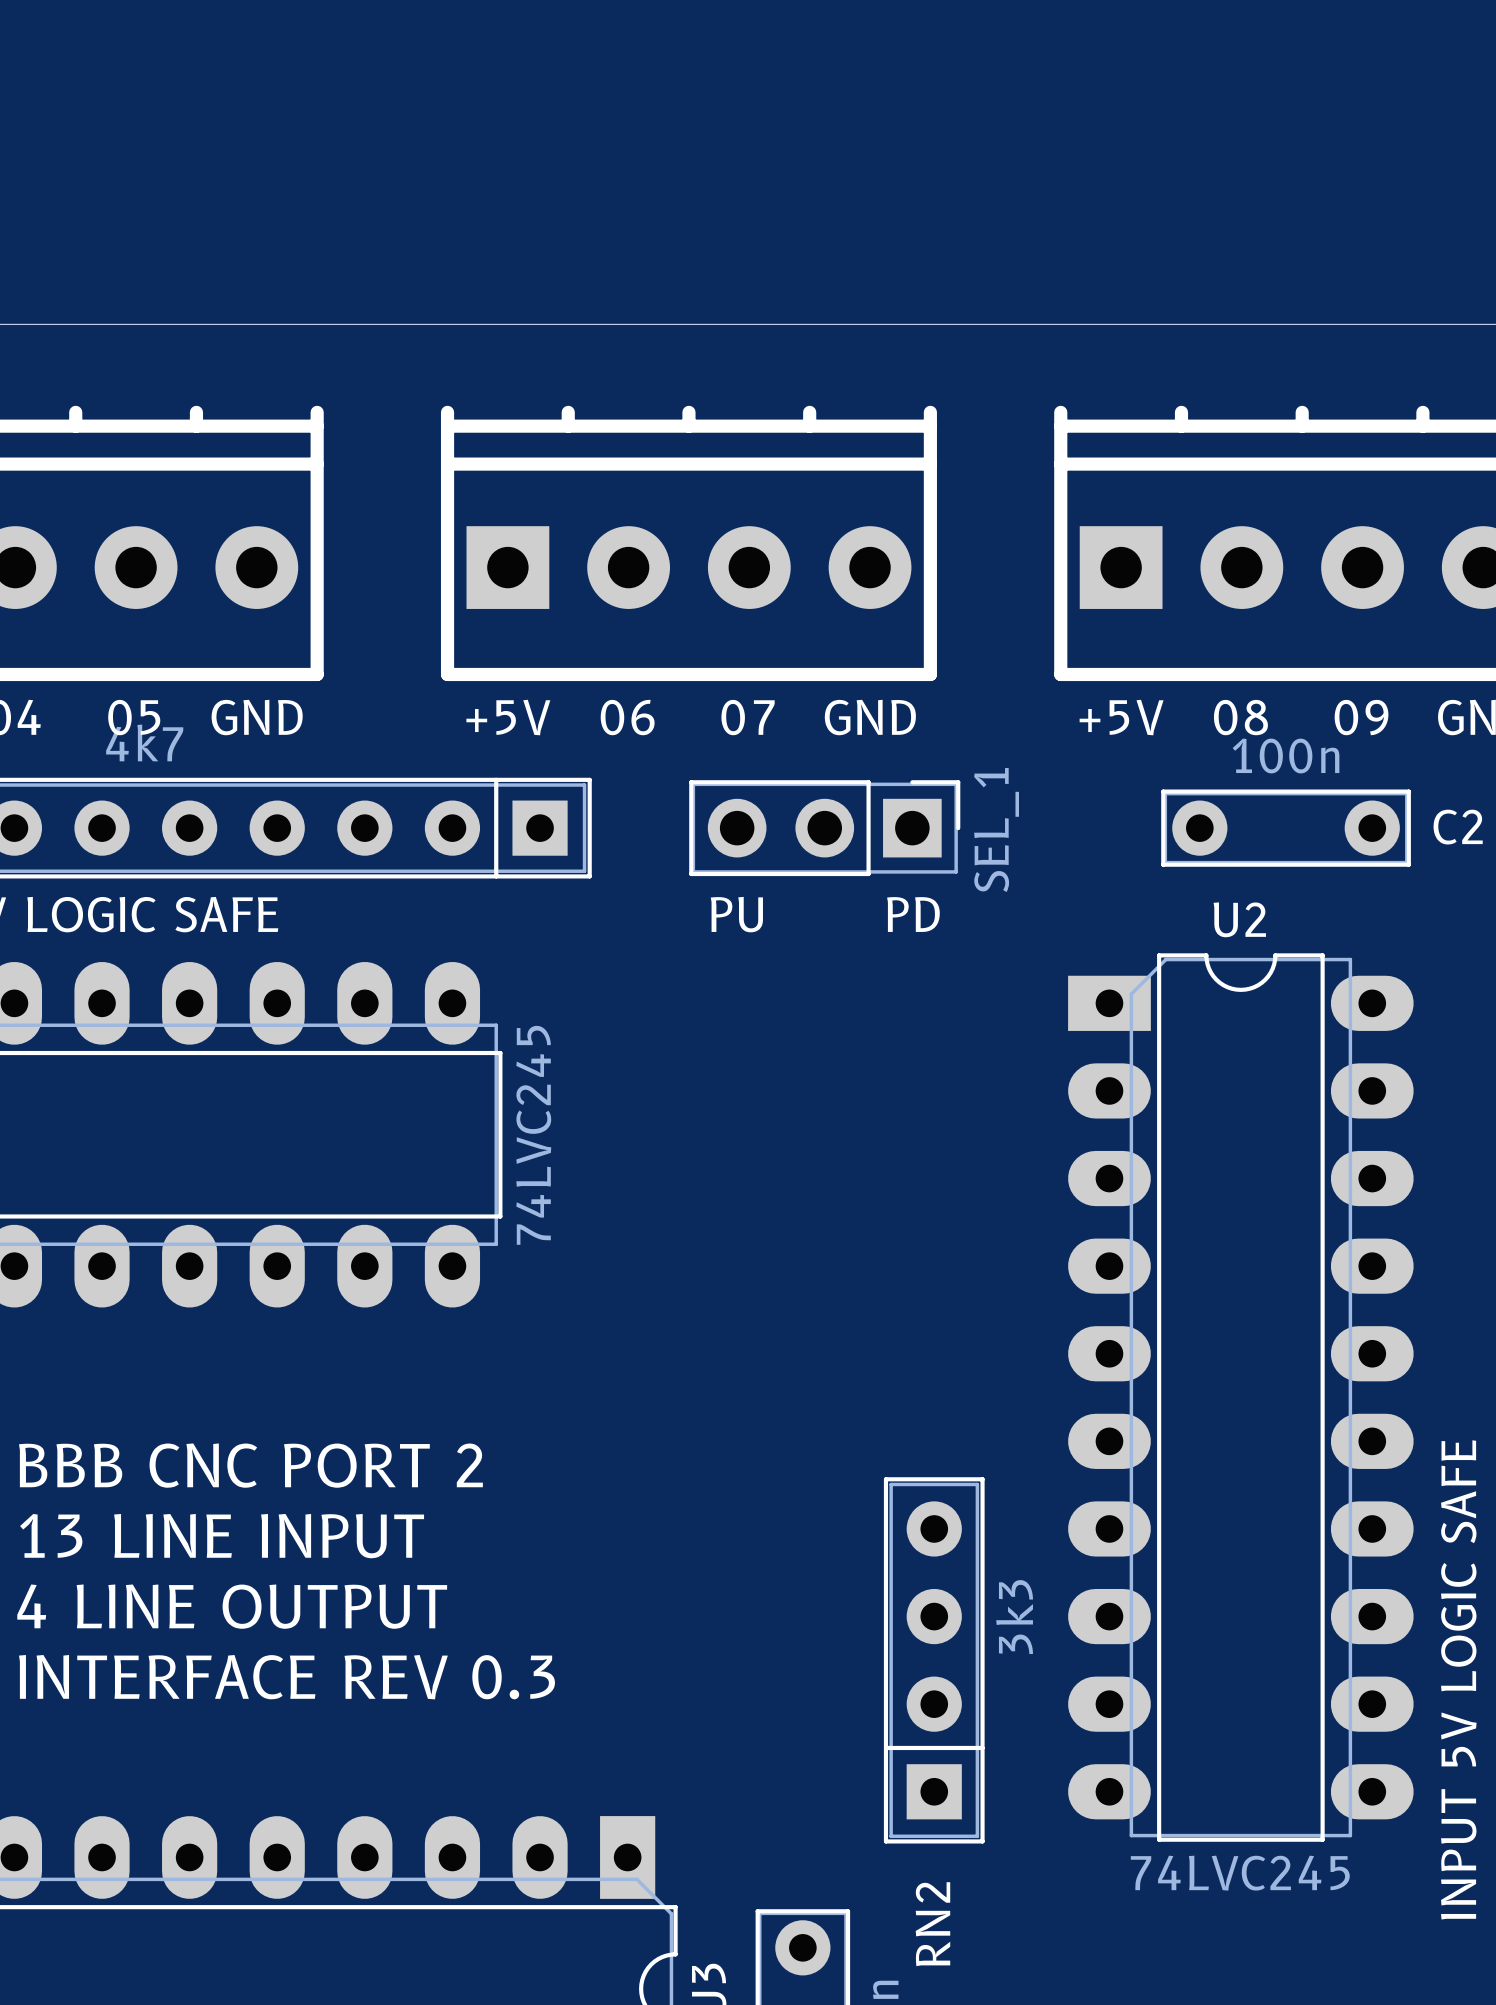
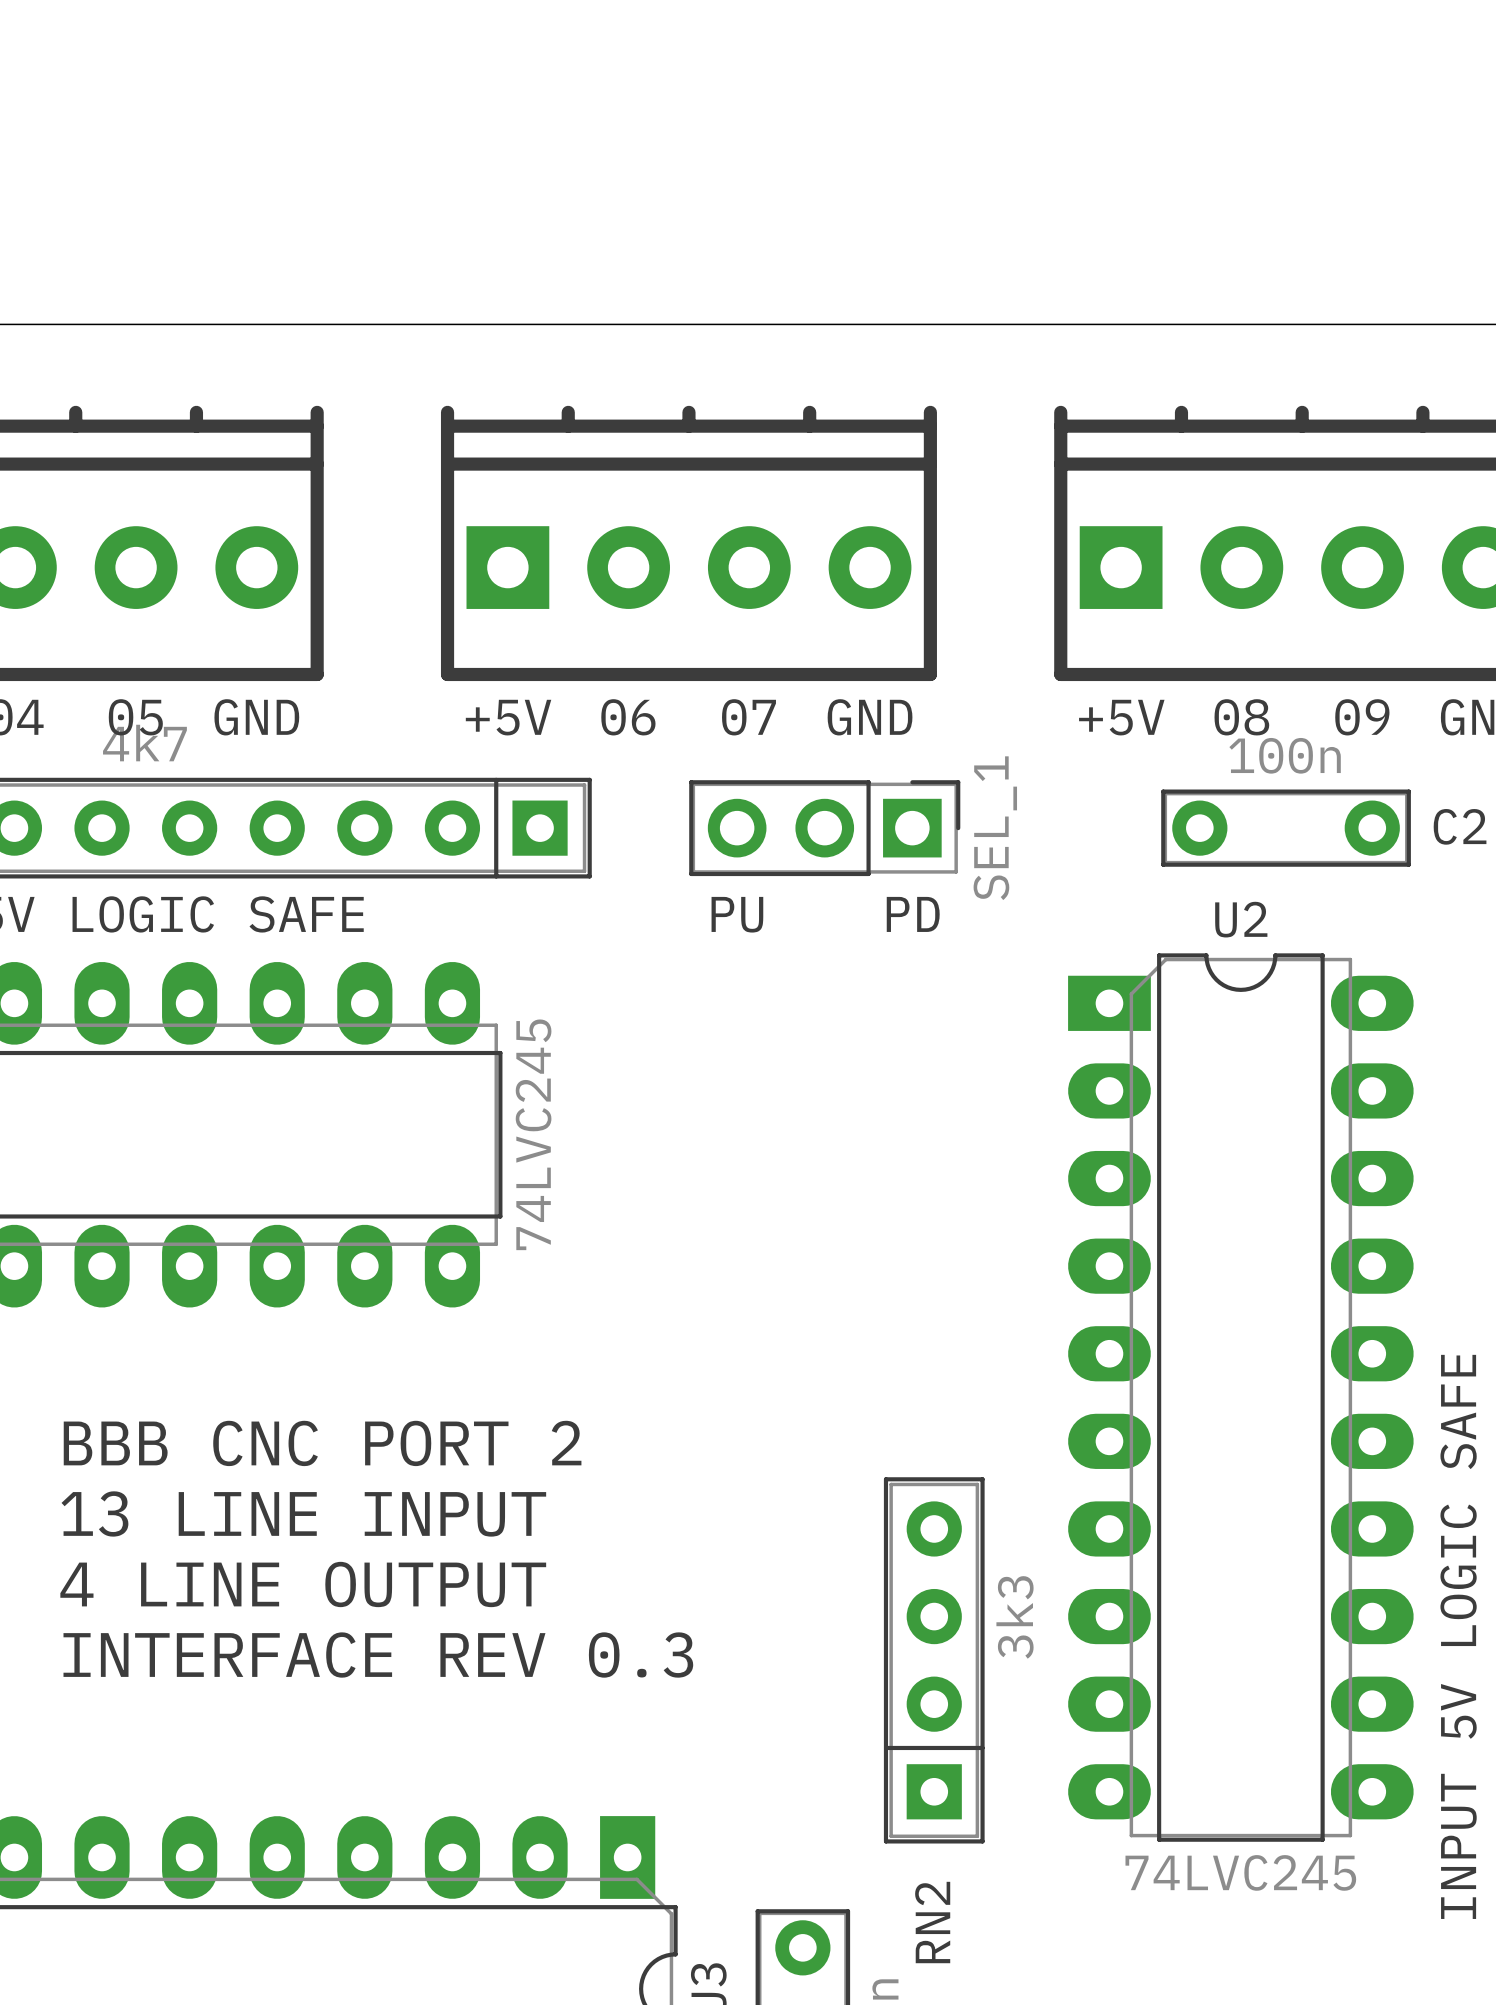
text position: BBB CNC PORT 2 (250, 1465) -> BBB CNC PORT 2 (322, 1443)
text position: 13 LINE INPUT (222, 1536) -> 13 LINE INPUT (303, 1513)
text position: 4 LINE OUTPUT (232, 1606) -> 4 LINE OUTPUT (303, 1584)
text position: INTERFACE REV 0.3 (287, 1677) -> INTERFACE REV 0.3 (378, 1655)

